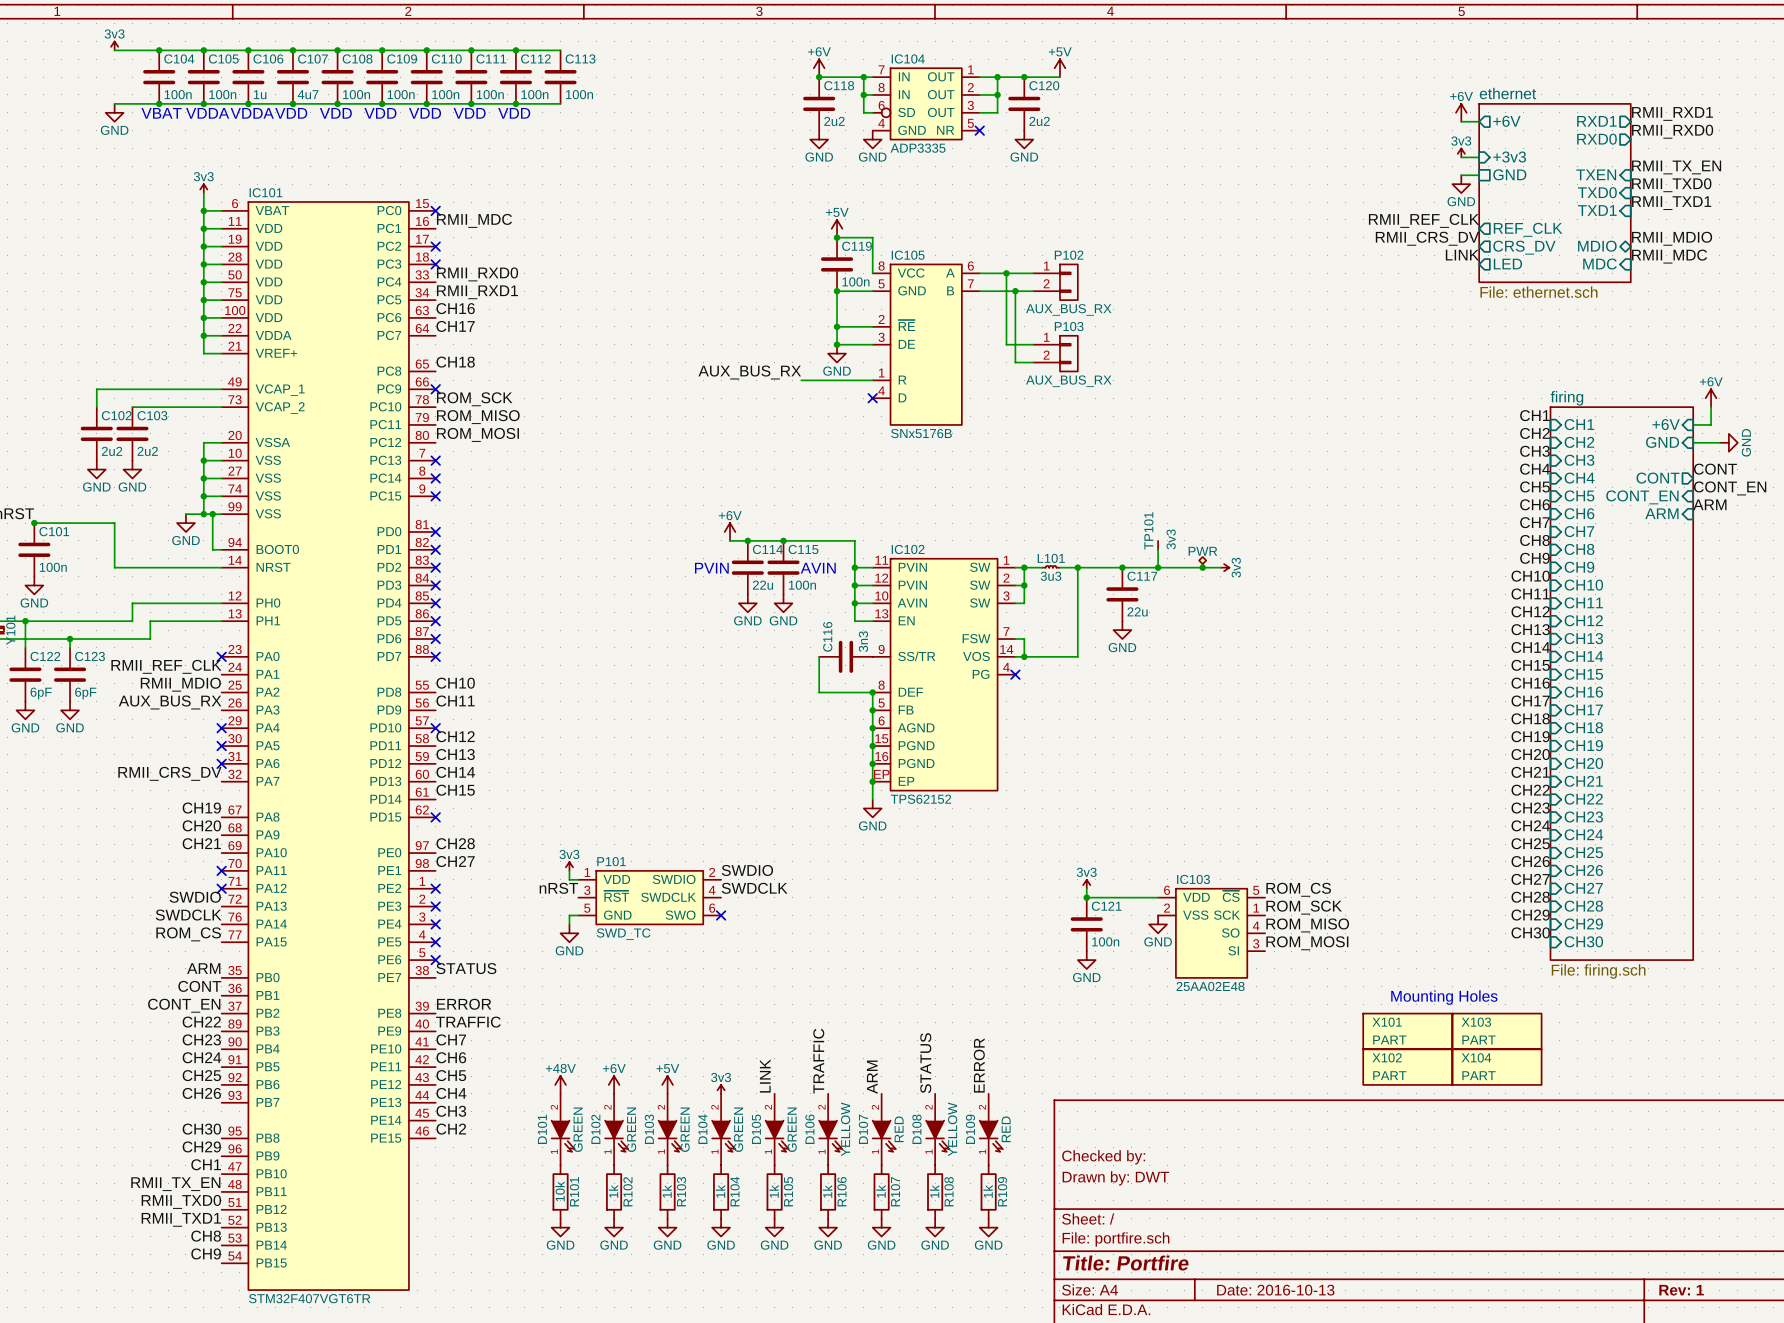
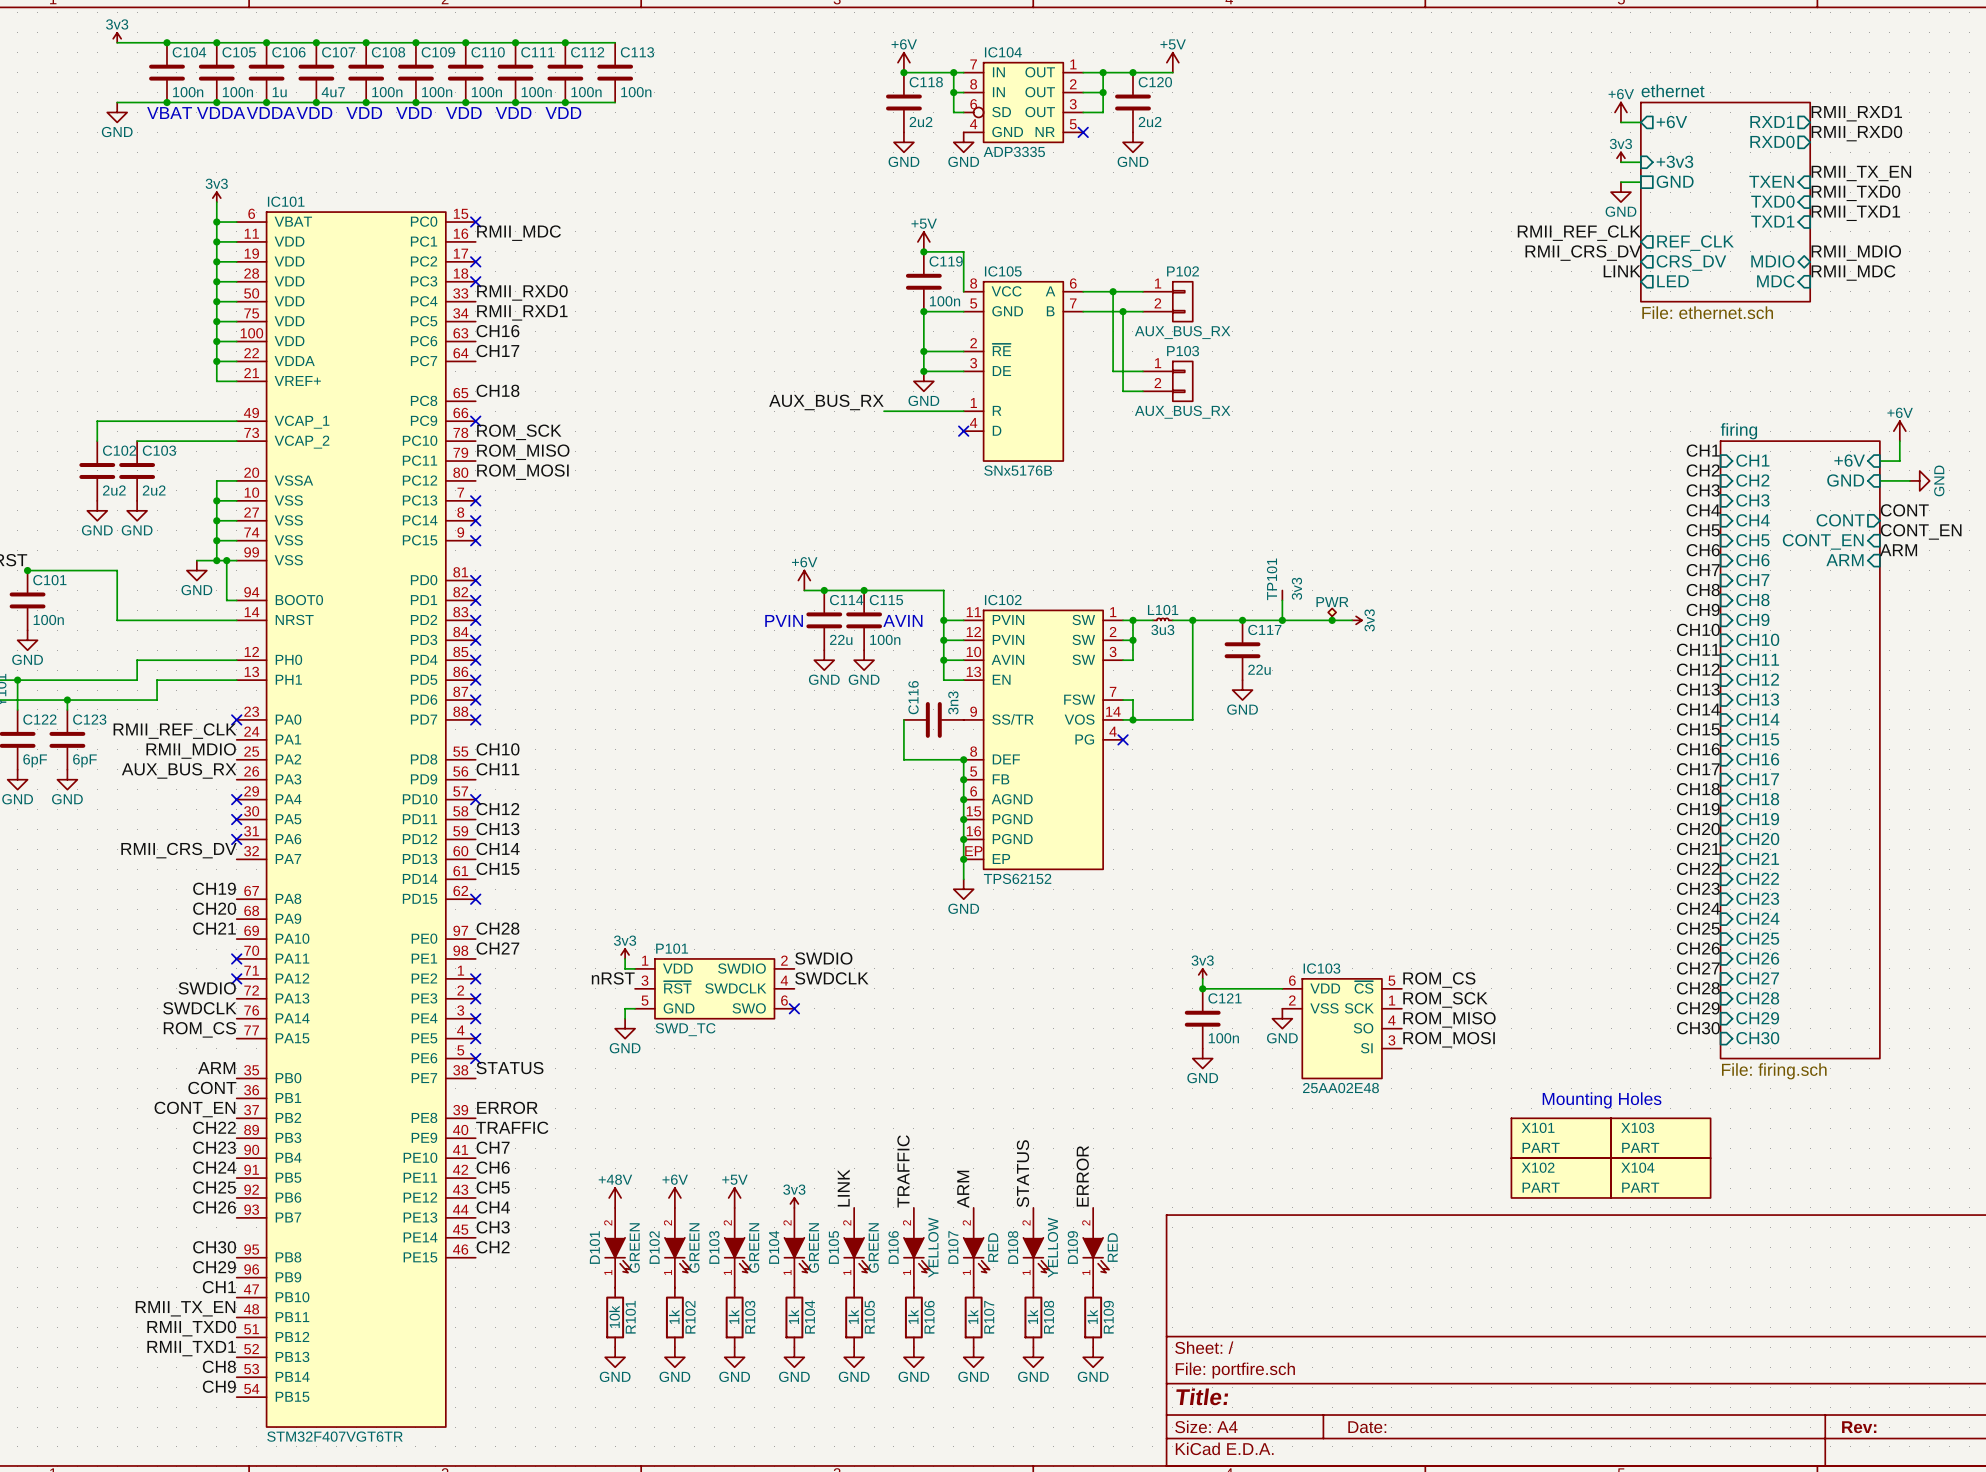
title block: Checked by: (1103, 1157) -> none
title block: Drawn by: DWT (1115, 1178) -> none
title block: Title: Portfire (1125, 1263) -> Title: (1202, 1396)
title block: Date: 2016-10-13 (1275, 1290) -> Date: (1367, 1427)
title block: Rev: 1 (1681, 1290) -> Rev: (1859, 1427)

